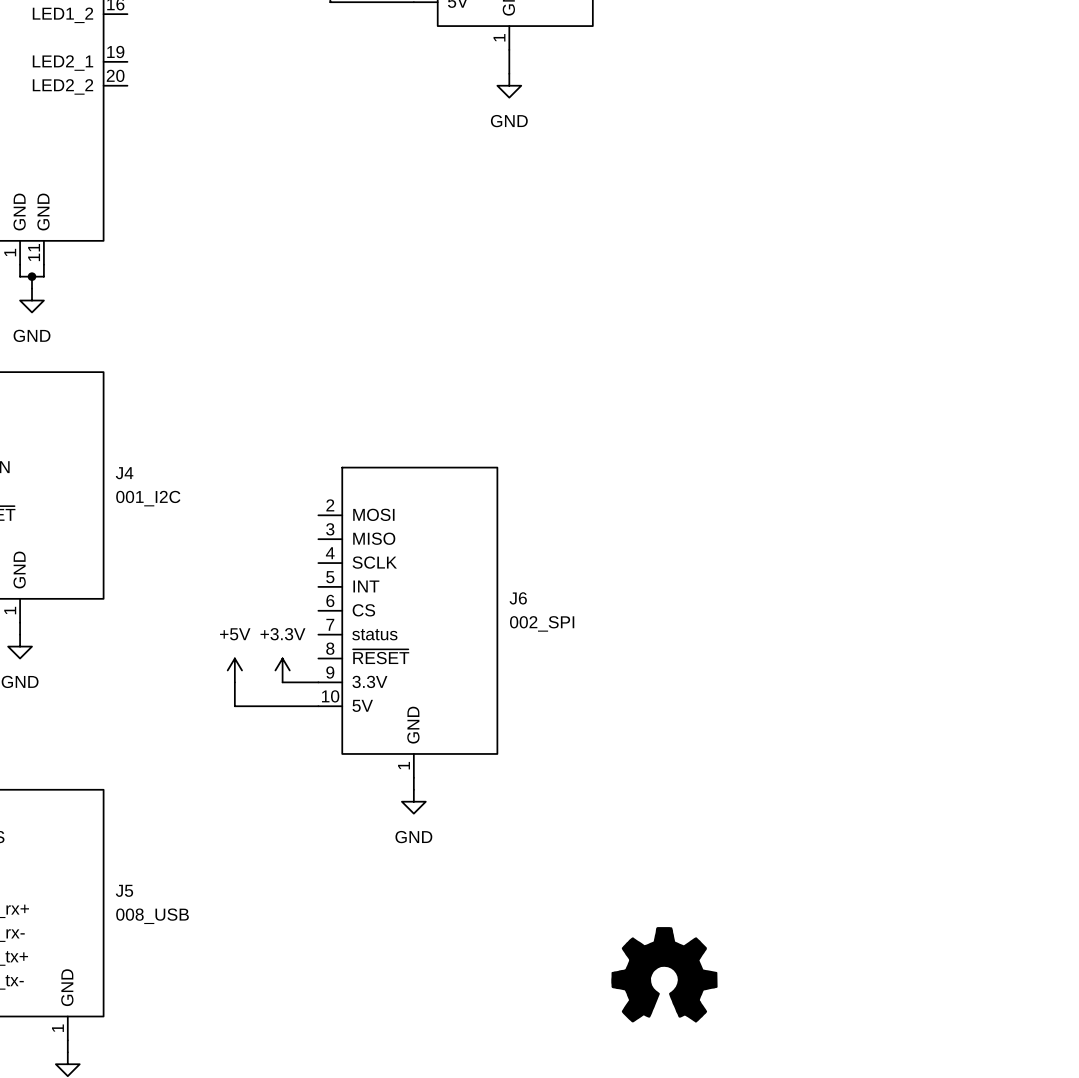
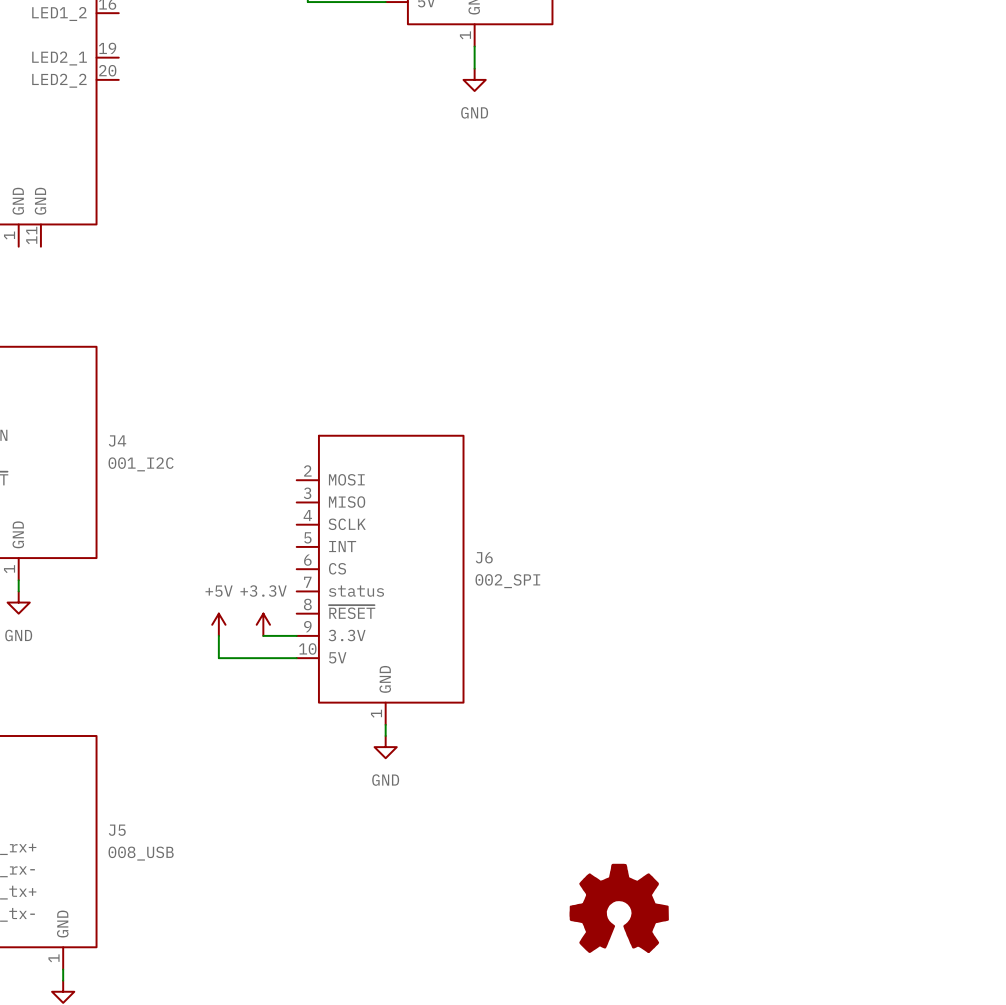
wire: (20, 264) (20, 276) (43, 276) (43, 264) -> none
wire: (32, 276) (32, 288) -> none
junction: (32, 276) -> none
power symbol: GND (32, 300) -> none

